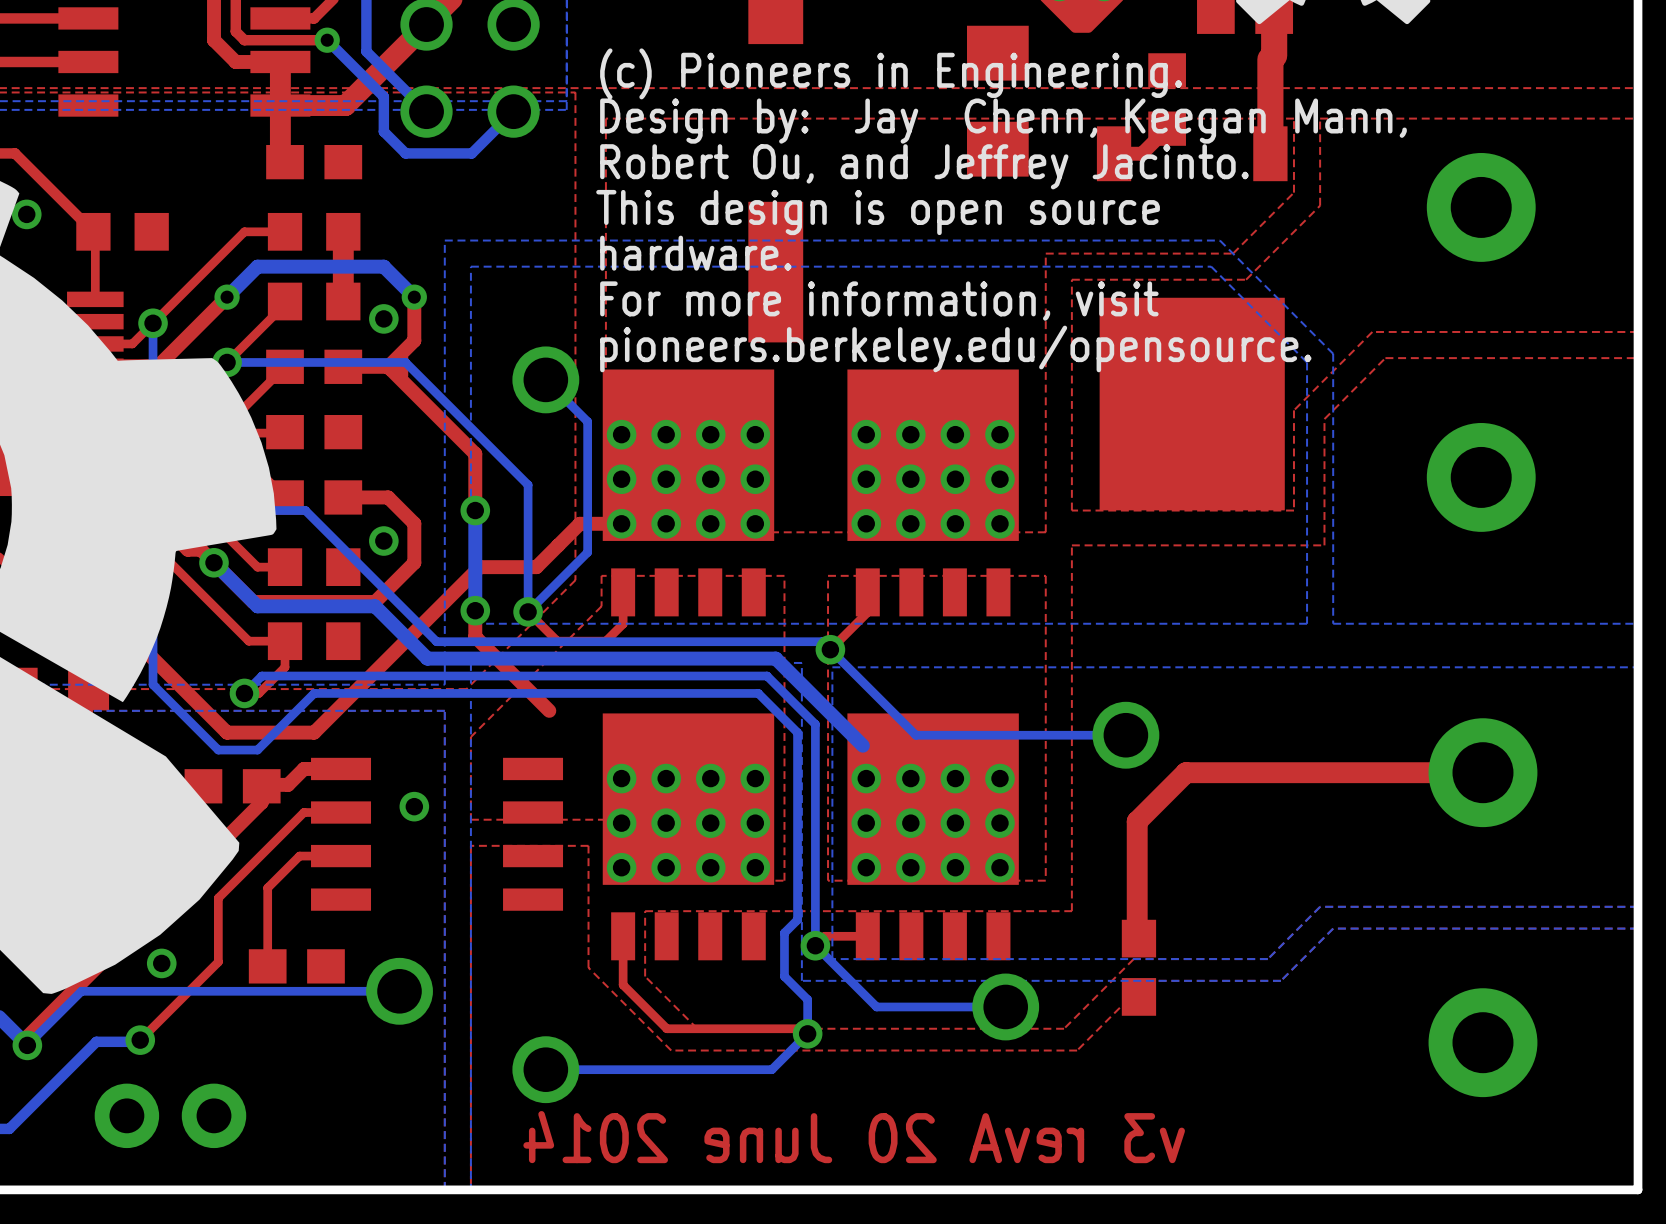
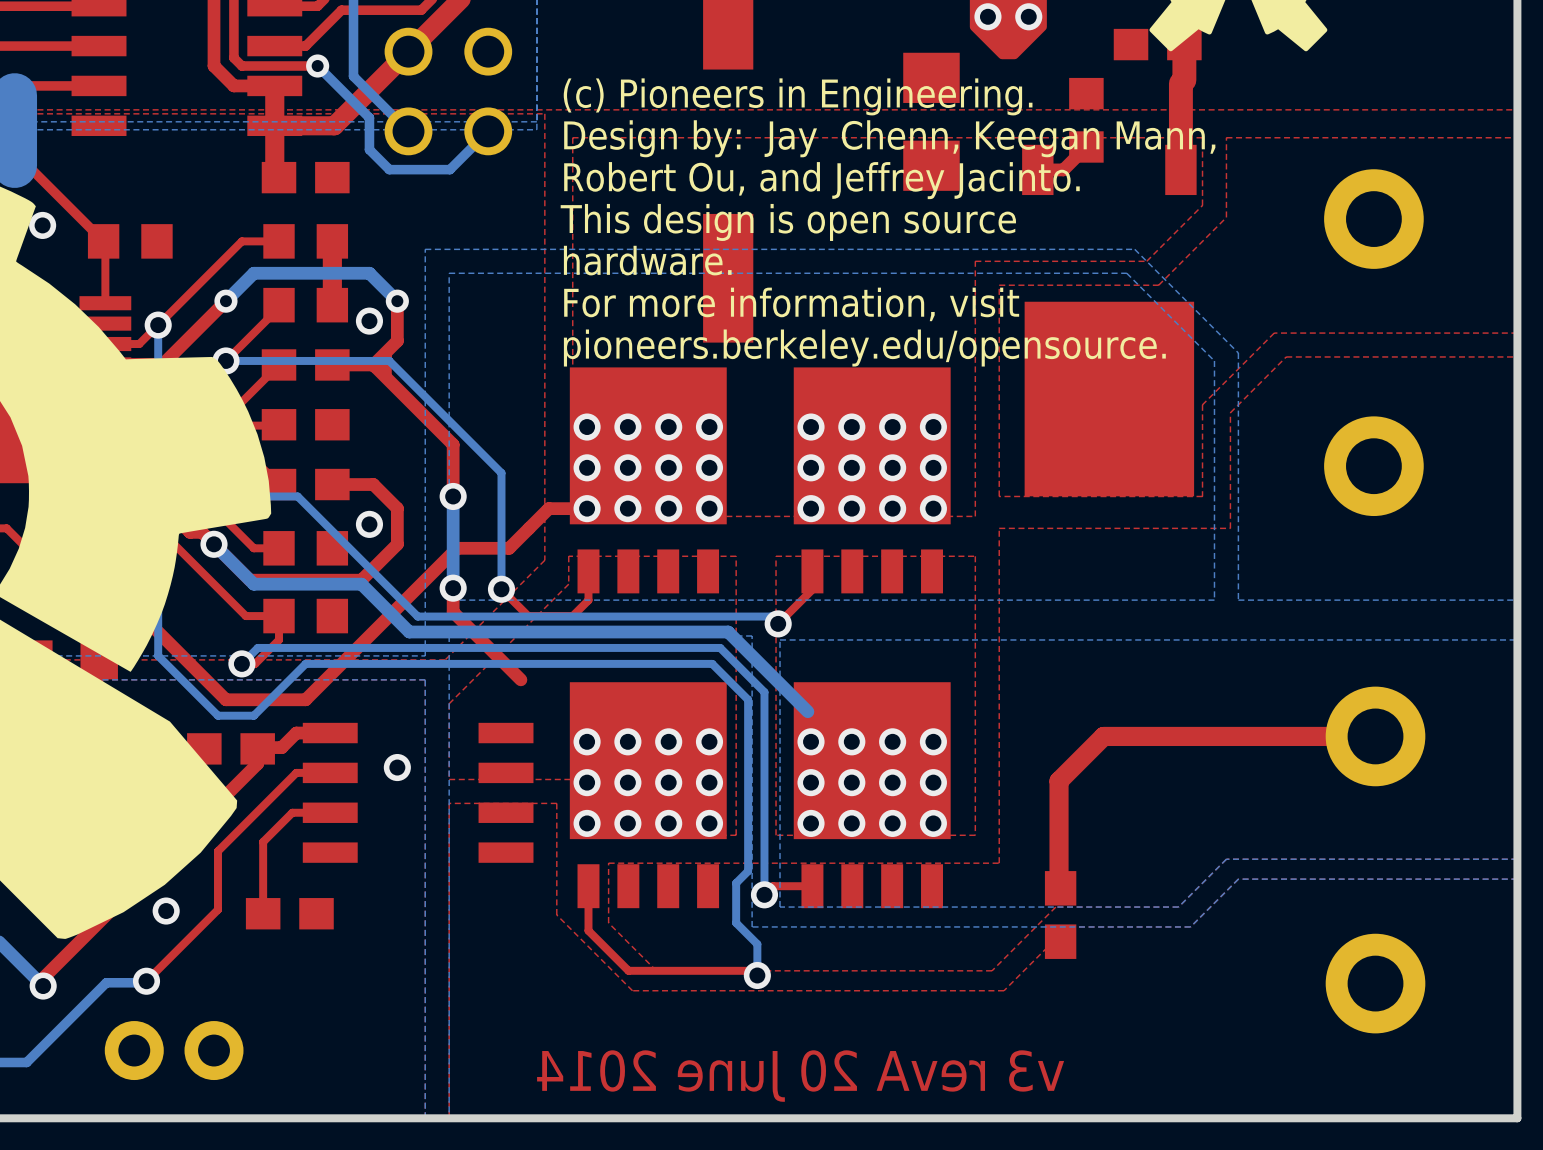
bottom track: (545, 379) (587, 421) (587, 552) (528, 611) -> none
via: (545, 379) -> none
bottom track: (830, 649) (915, 735) (1125, 735) -> none
via: (1125, 735) -> none
bottom track: (815, 945) (876, 1006) (1005, 1006) -> none
bottom track: (399, 991) (81, 991) (27, 1045) -> none
via: (399, 991) -> none
via: (1005, 1006) -> none
bottom track: (807, 1033) (771, 1069) (545, 1069) -> none
via: (545, 1069) -> none

